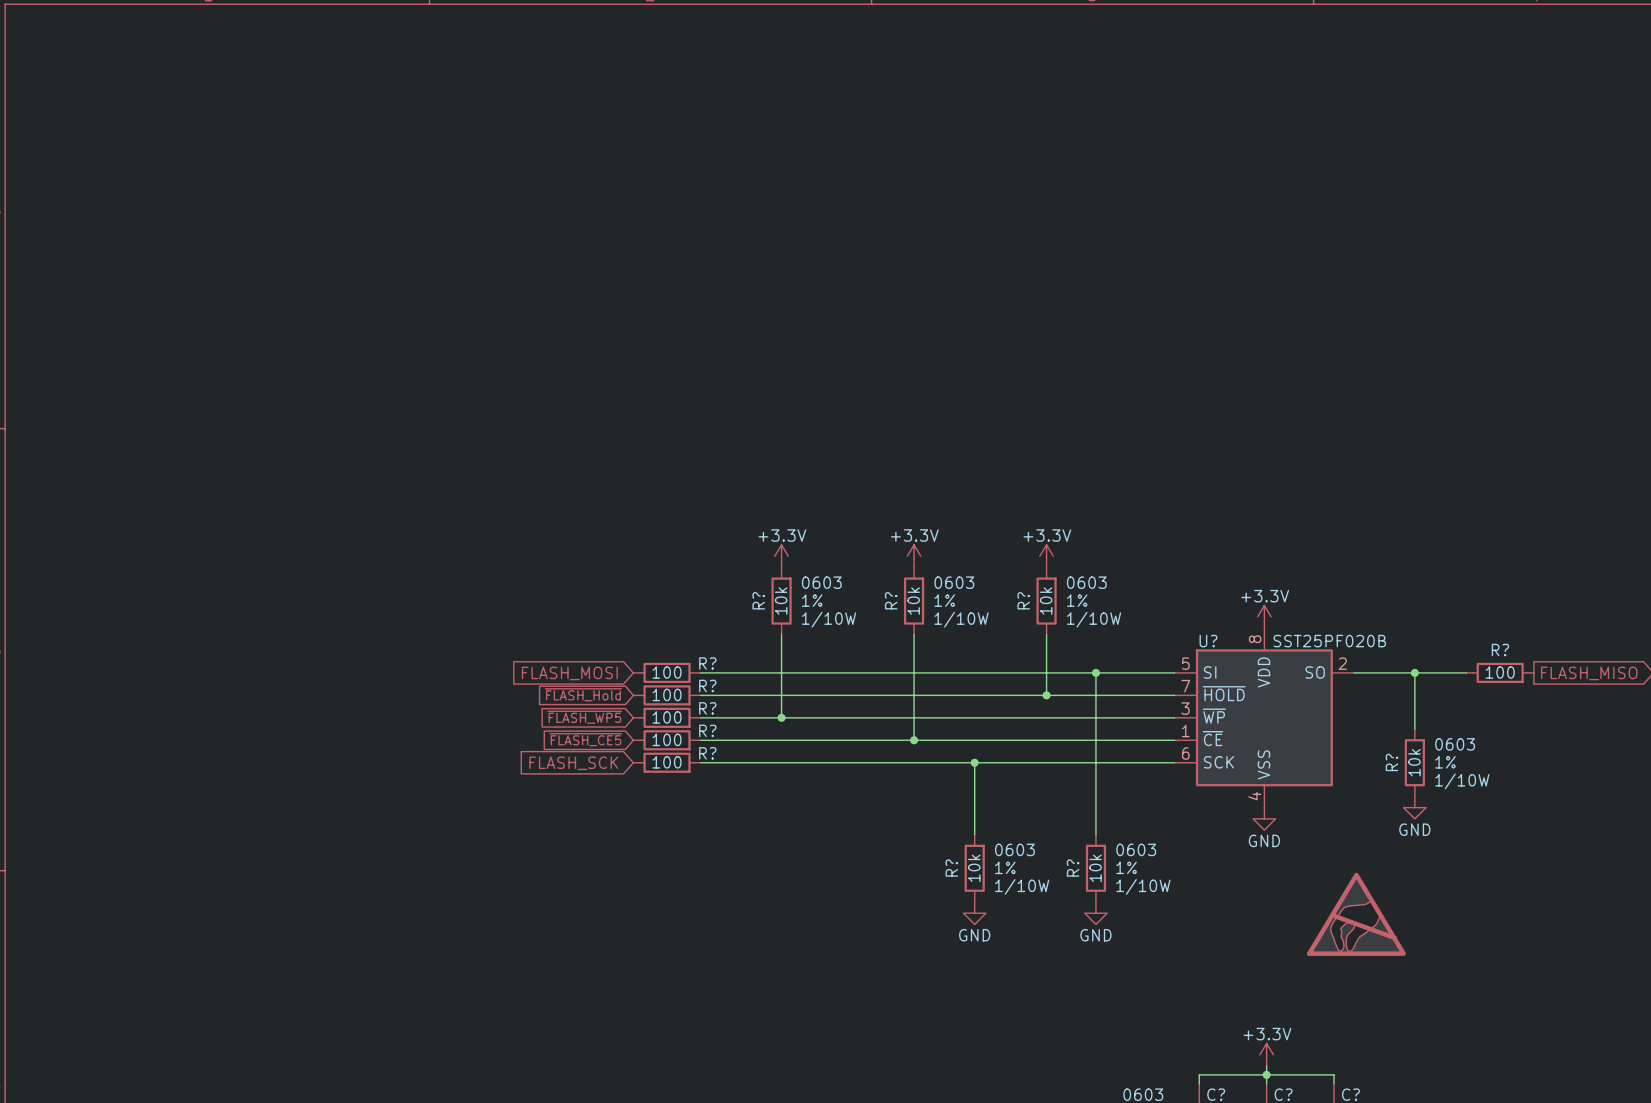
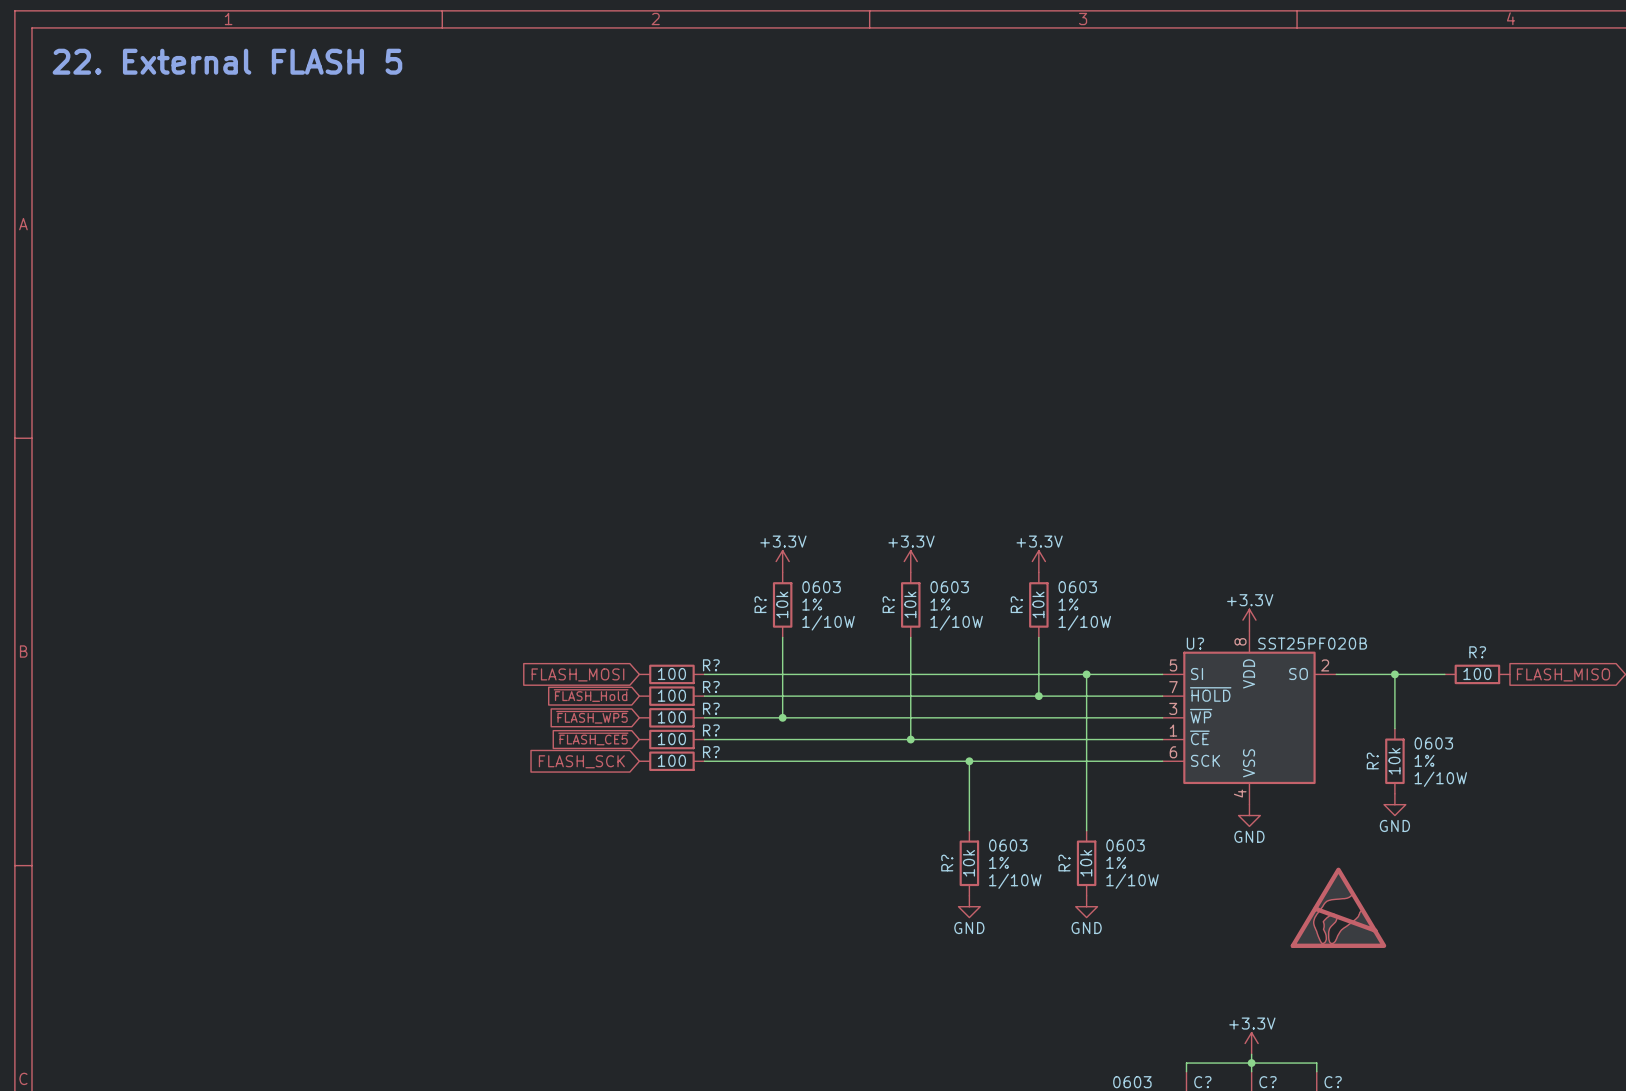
text: none -> 22. External FLASH 5 (227, 61)

